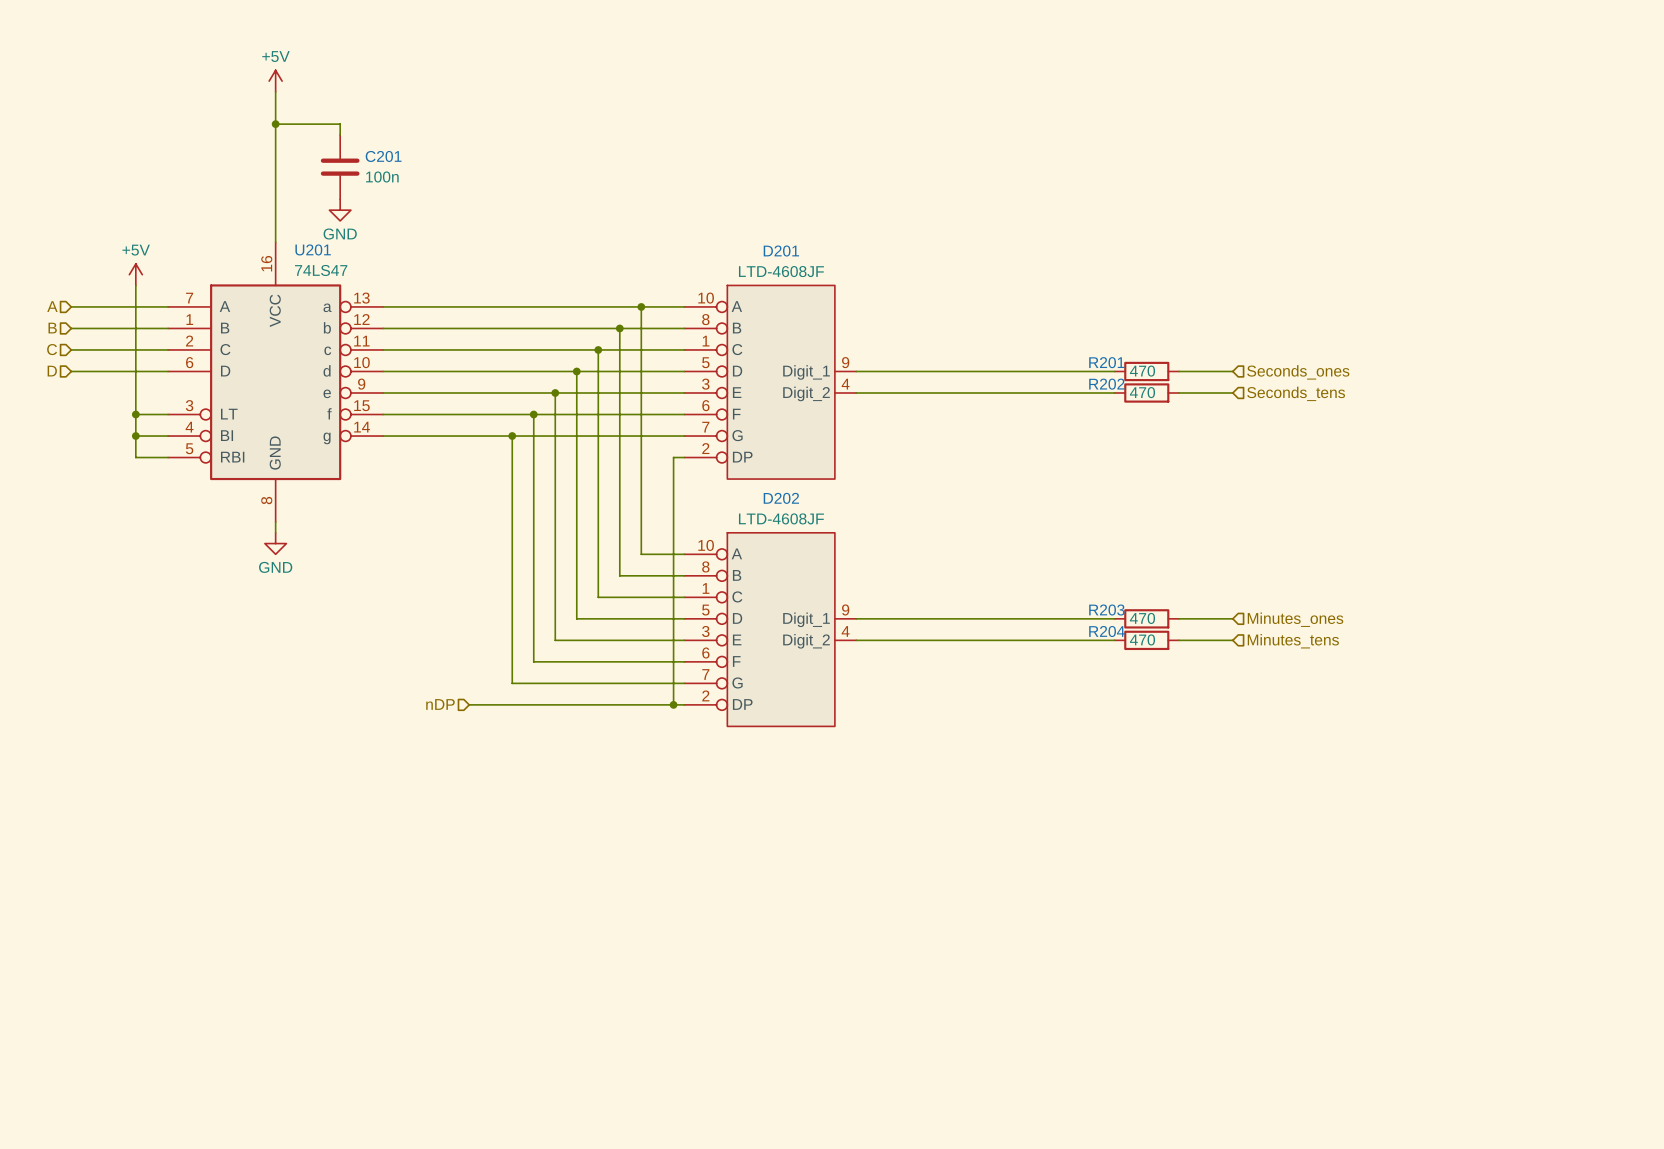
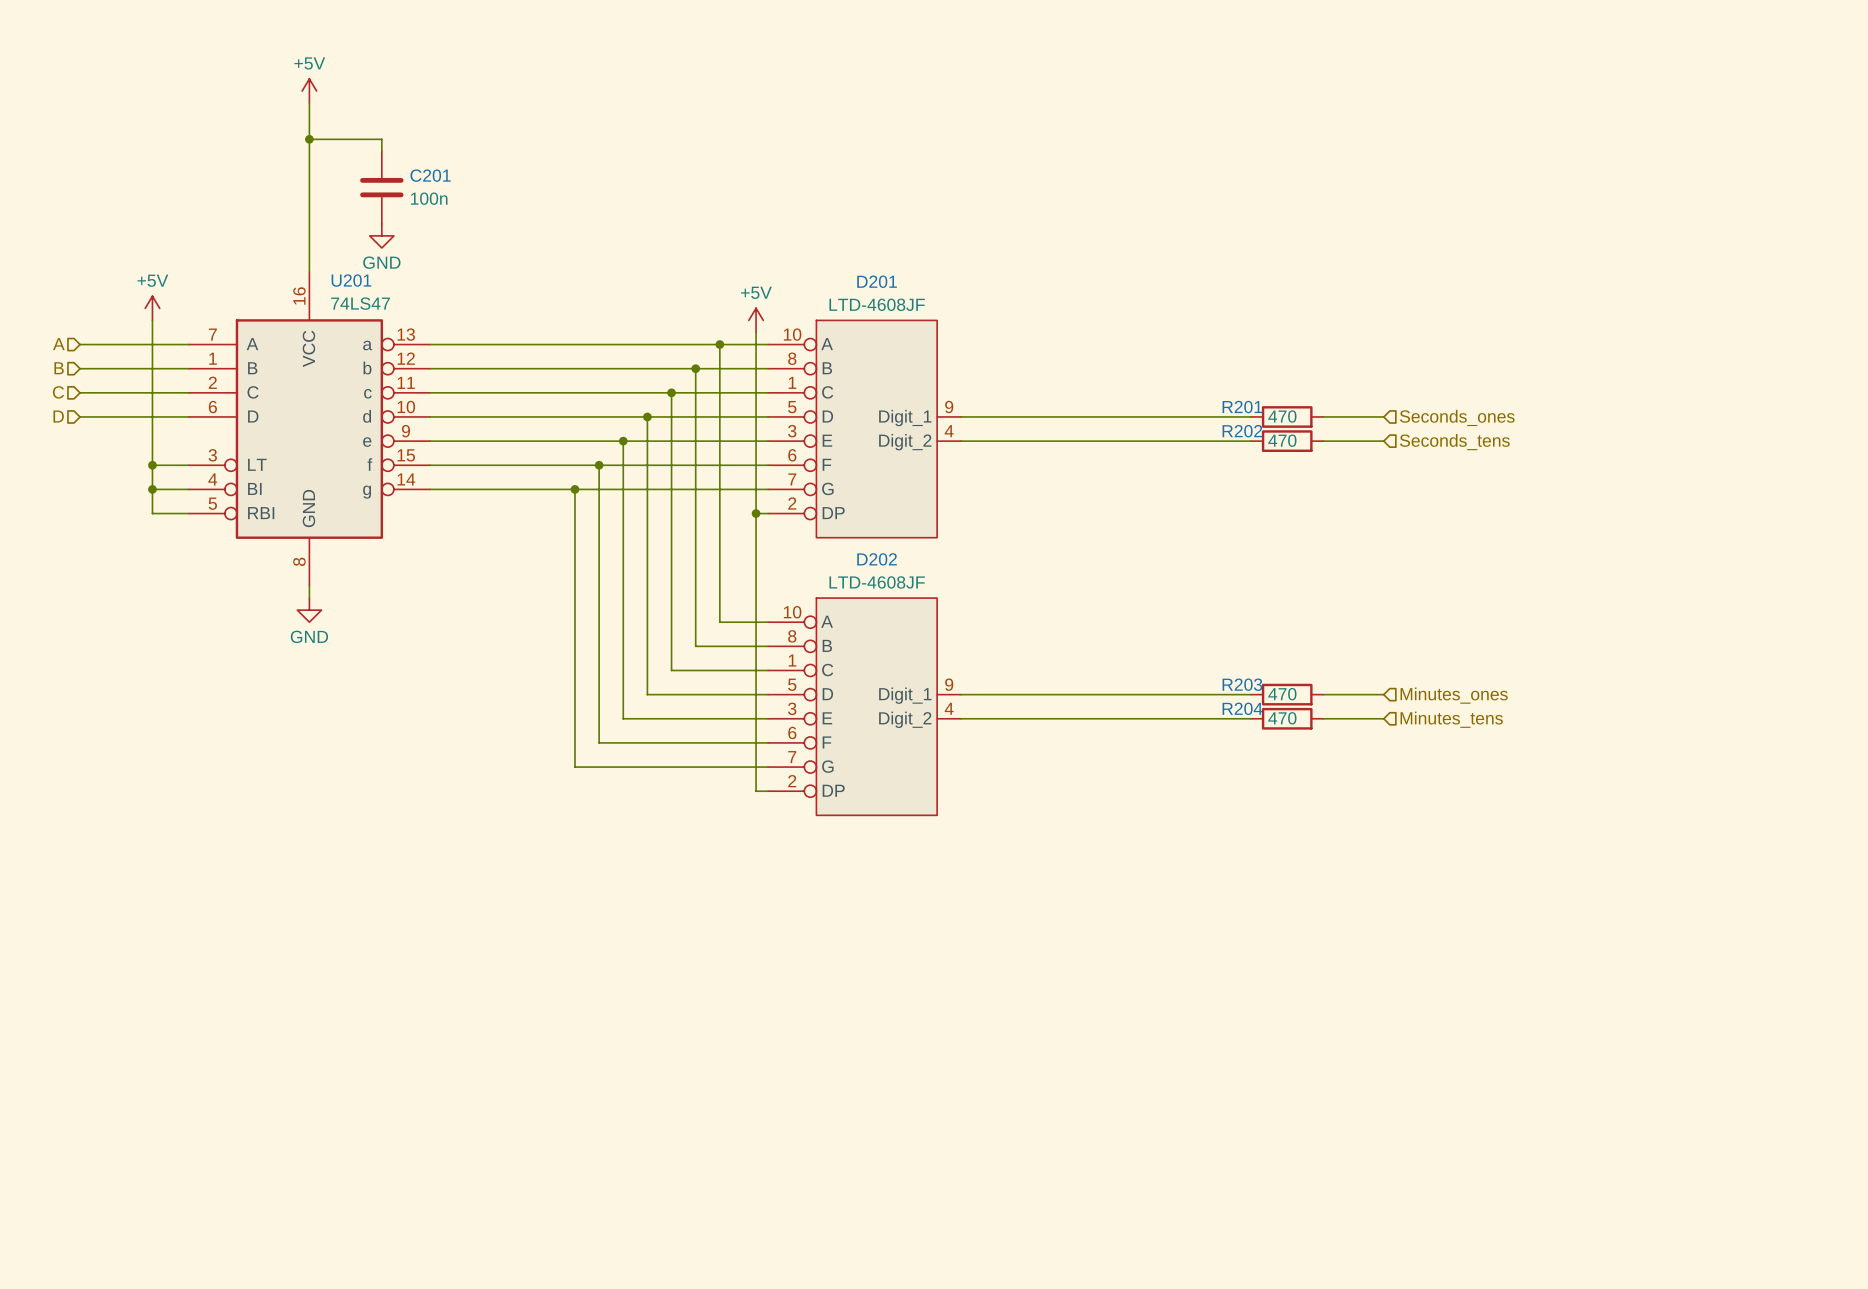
power symbol: none -> +5V (756, 320)
wire: none -> (756, 332) (756, 513)
junction: none -> (756, 513)
hierarchical label: nDP (440, 704) -> none
wire: (469, 704) (673, 704) -> none
junction: (673, 704) -> none

